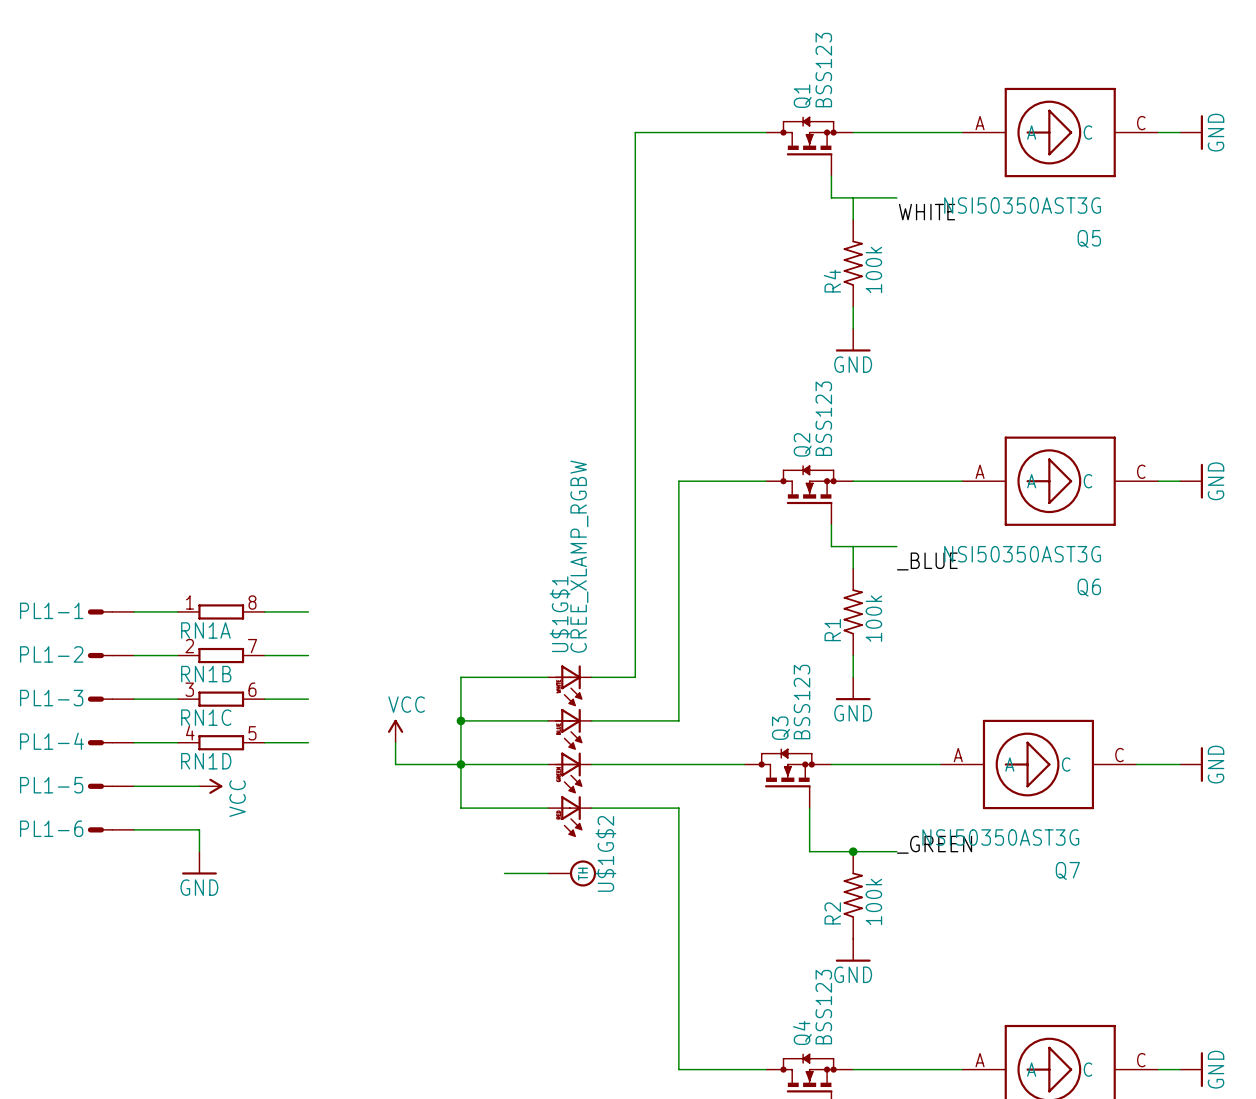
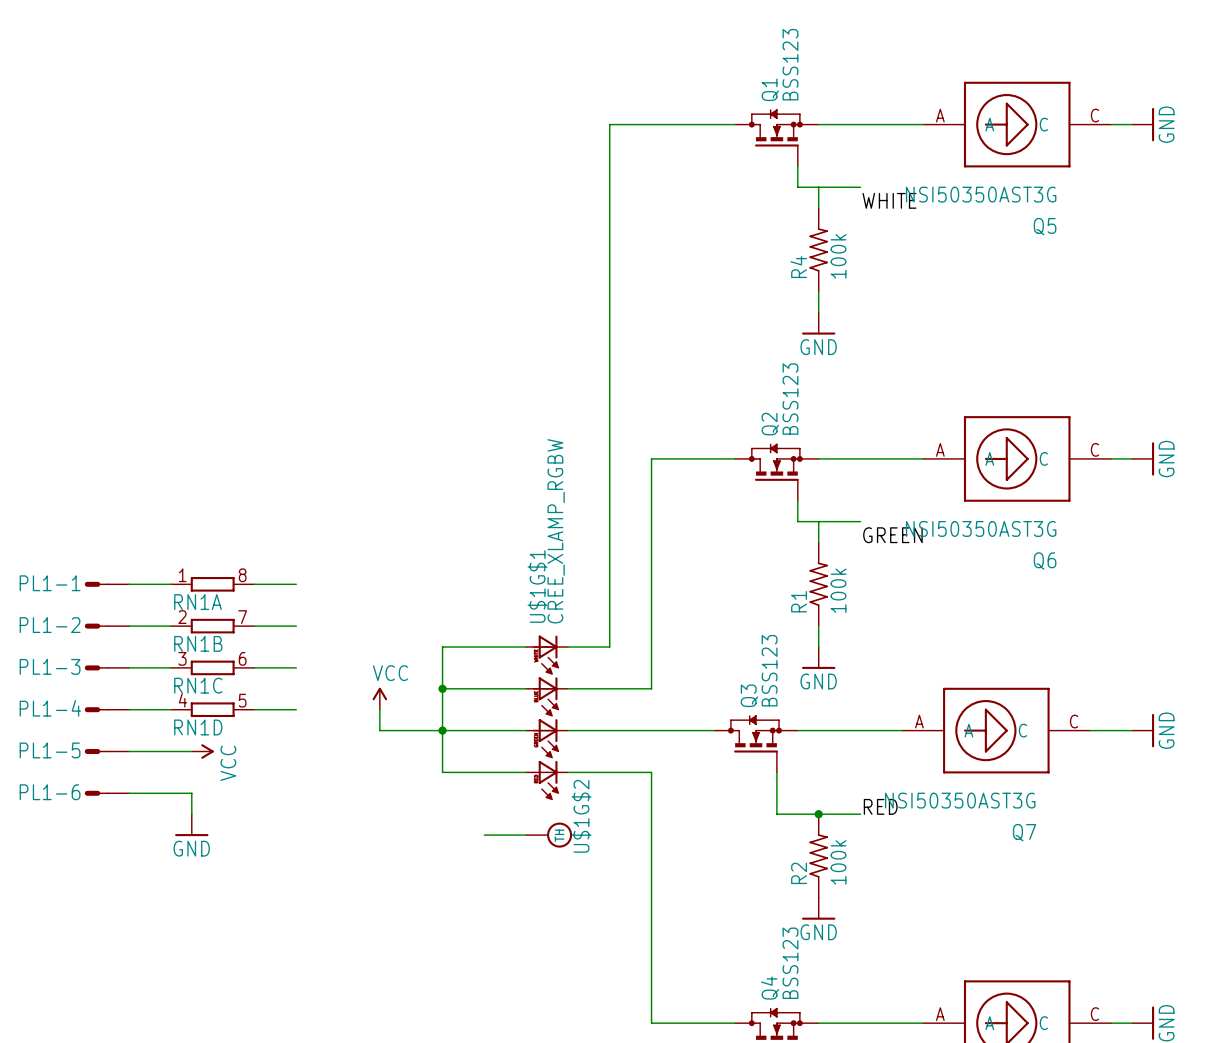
label: _BLUE (927, 561) -> GREEN (892, 535)
label: _GREEN (934, 844) -> RED (880, 806)

